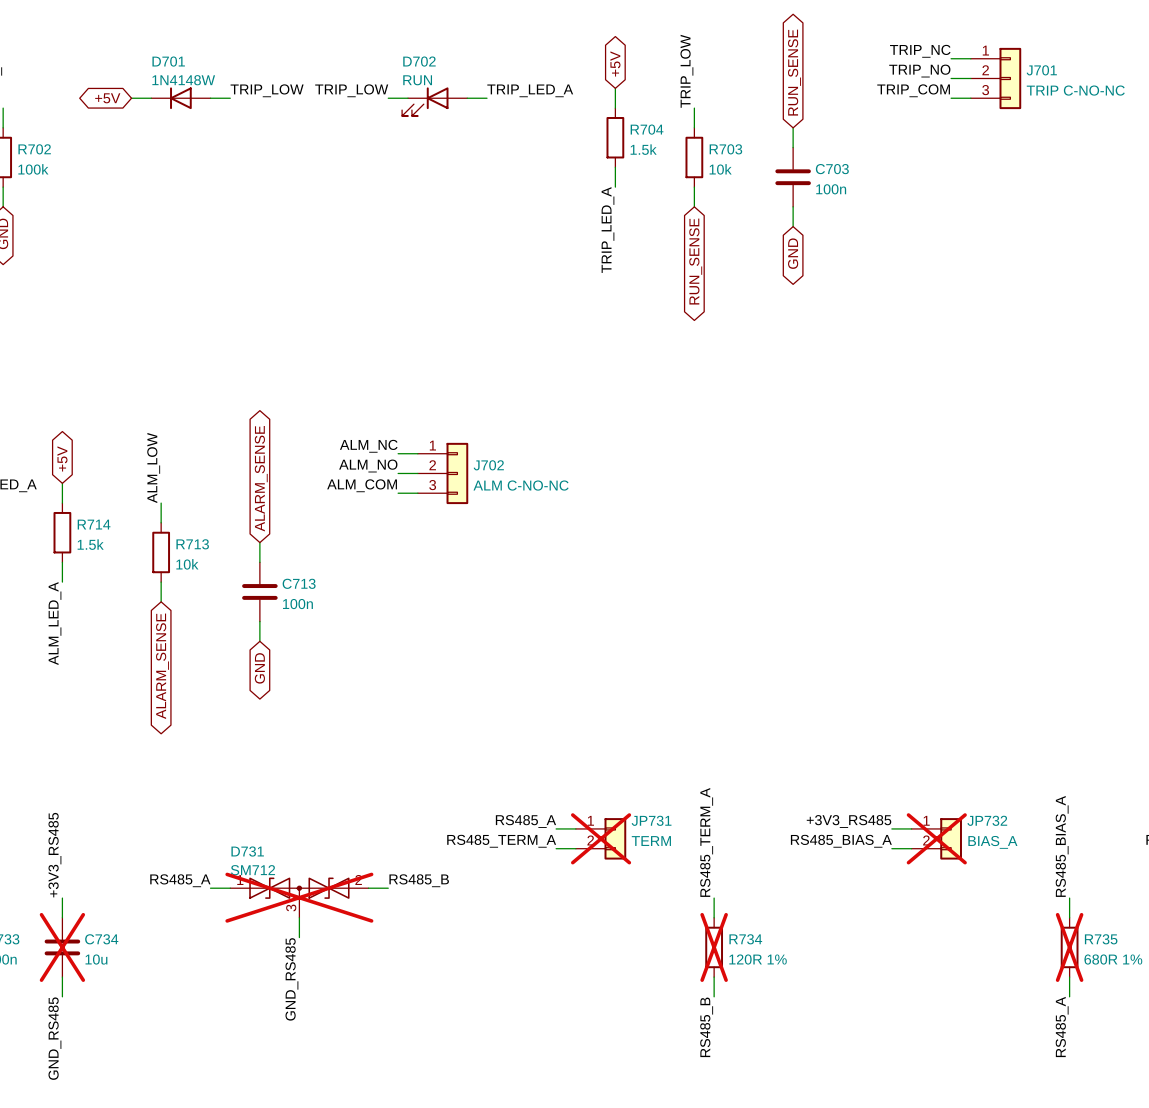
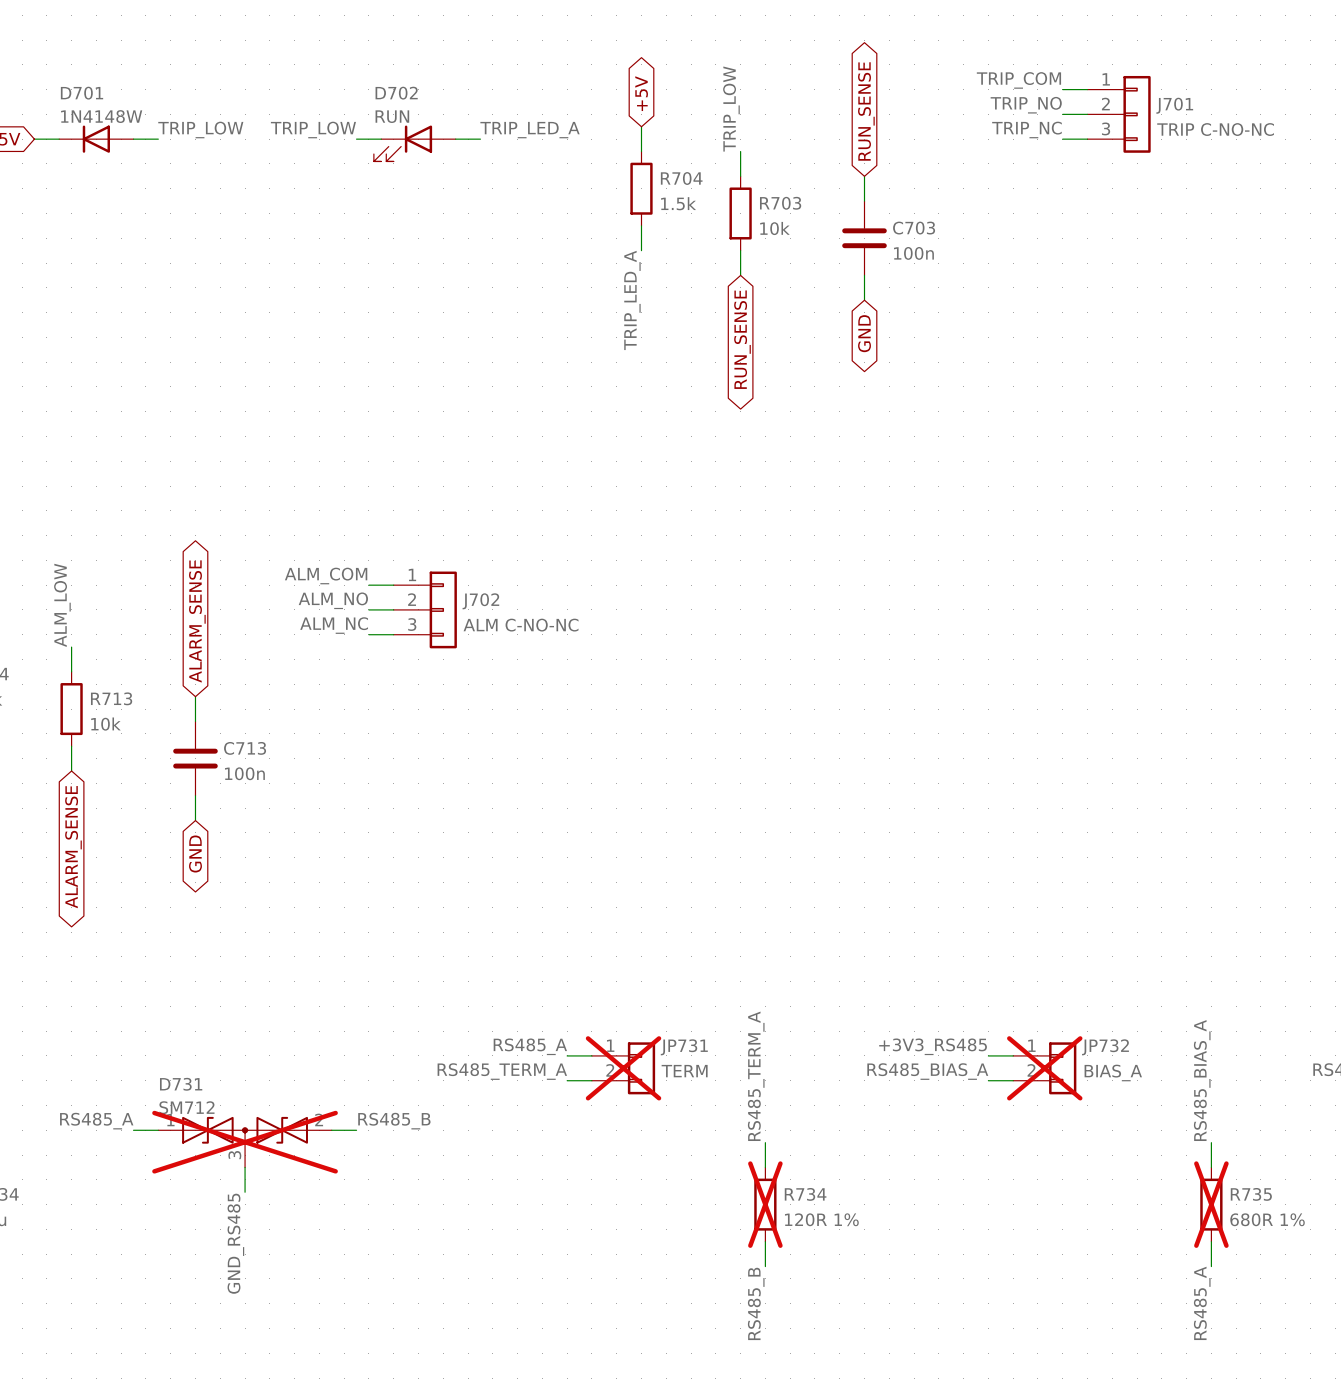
label: TRIP_NC (920, 51) -> TRIP_COM (1018, 80)
label: TRIP_COM (913, 90) -> TRIP_NC (1026, 129)
label: ALM_NC (368, 446) -> ALM_COM (326, 576)
label: ALM_COM (362, 485) -> ALM_NC (334, 625)

